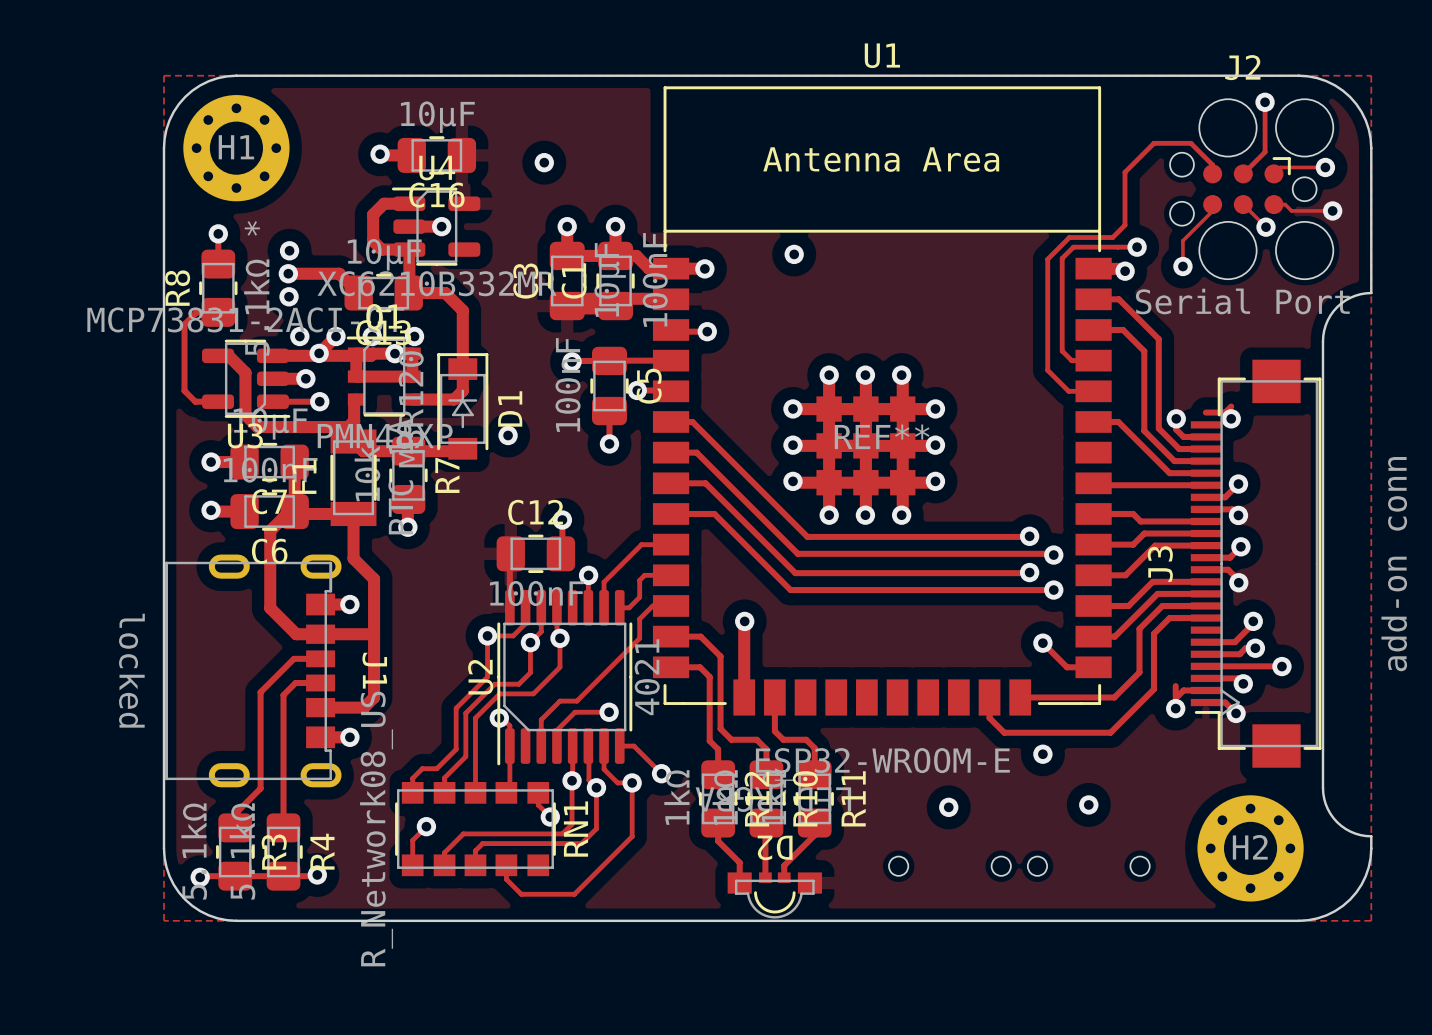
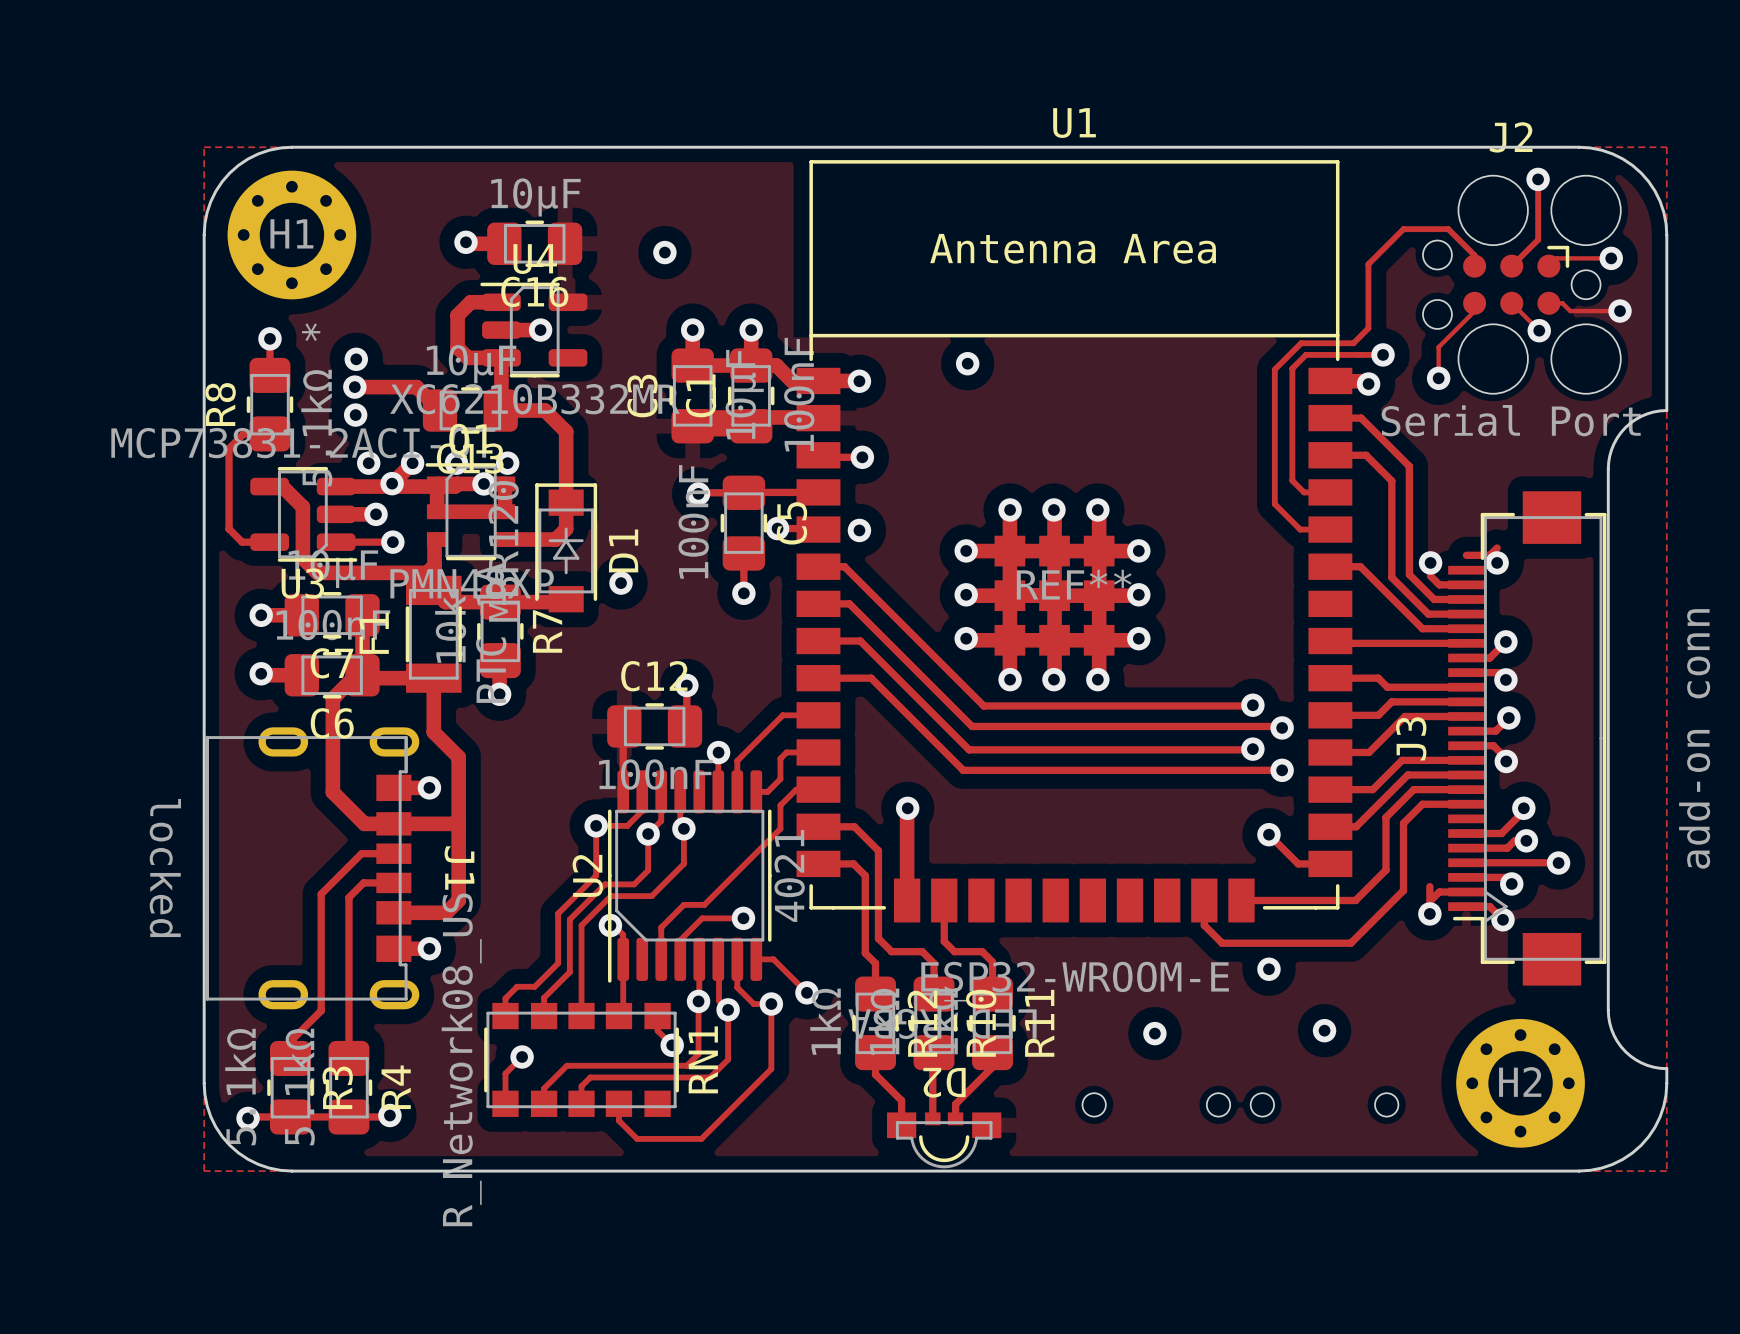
via: none -> (859, 530)

